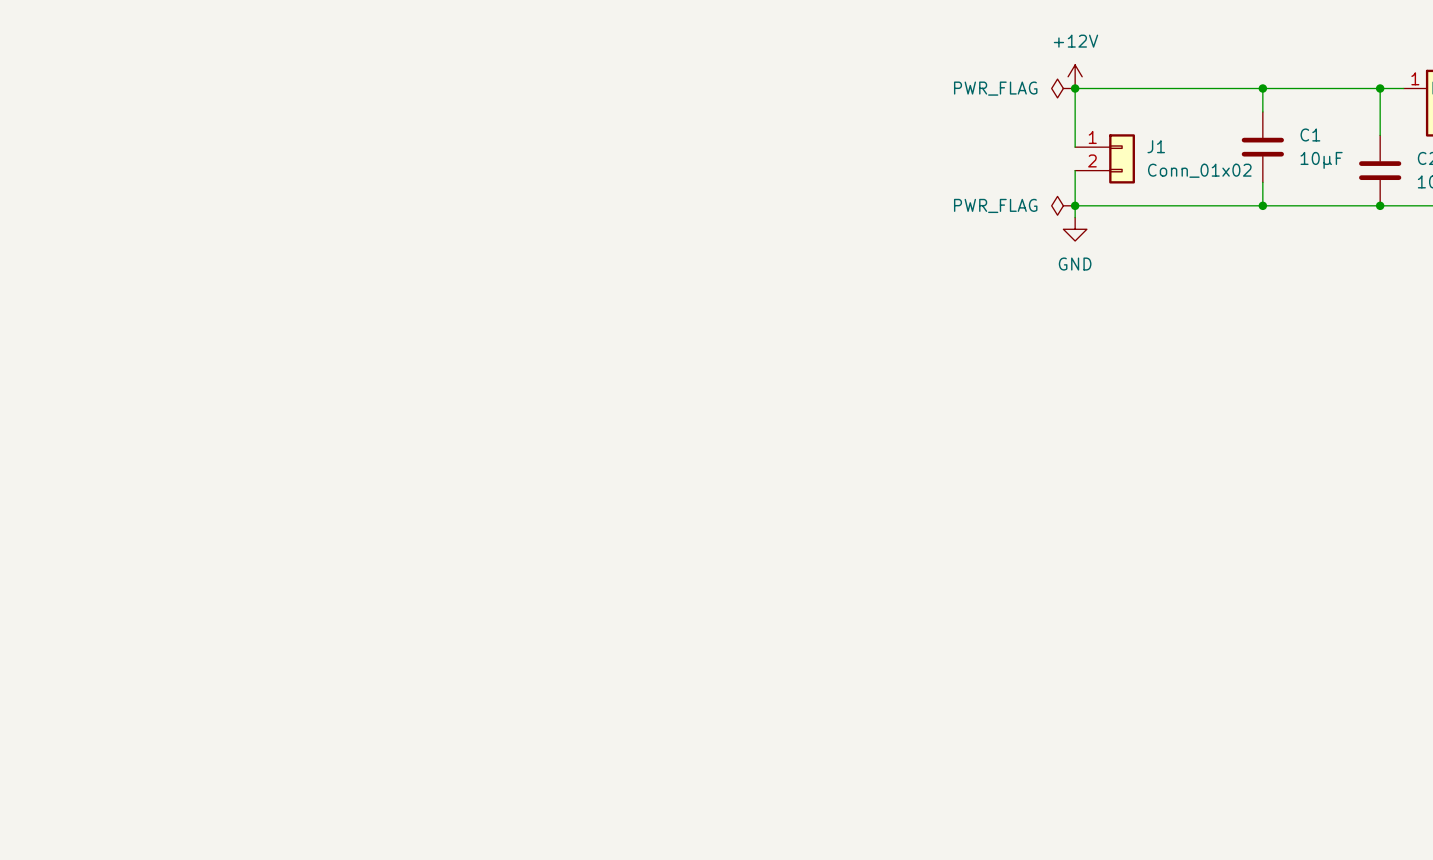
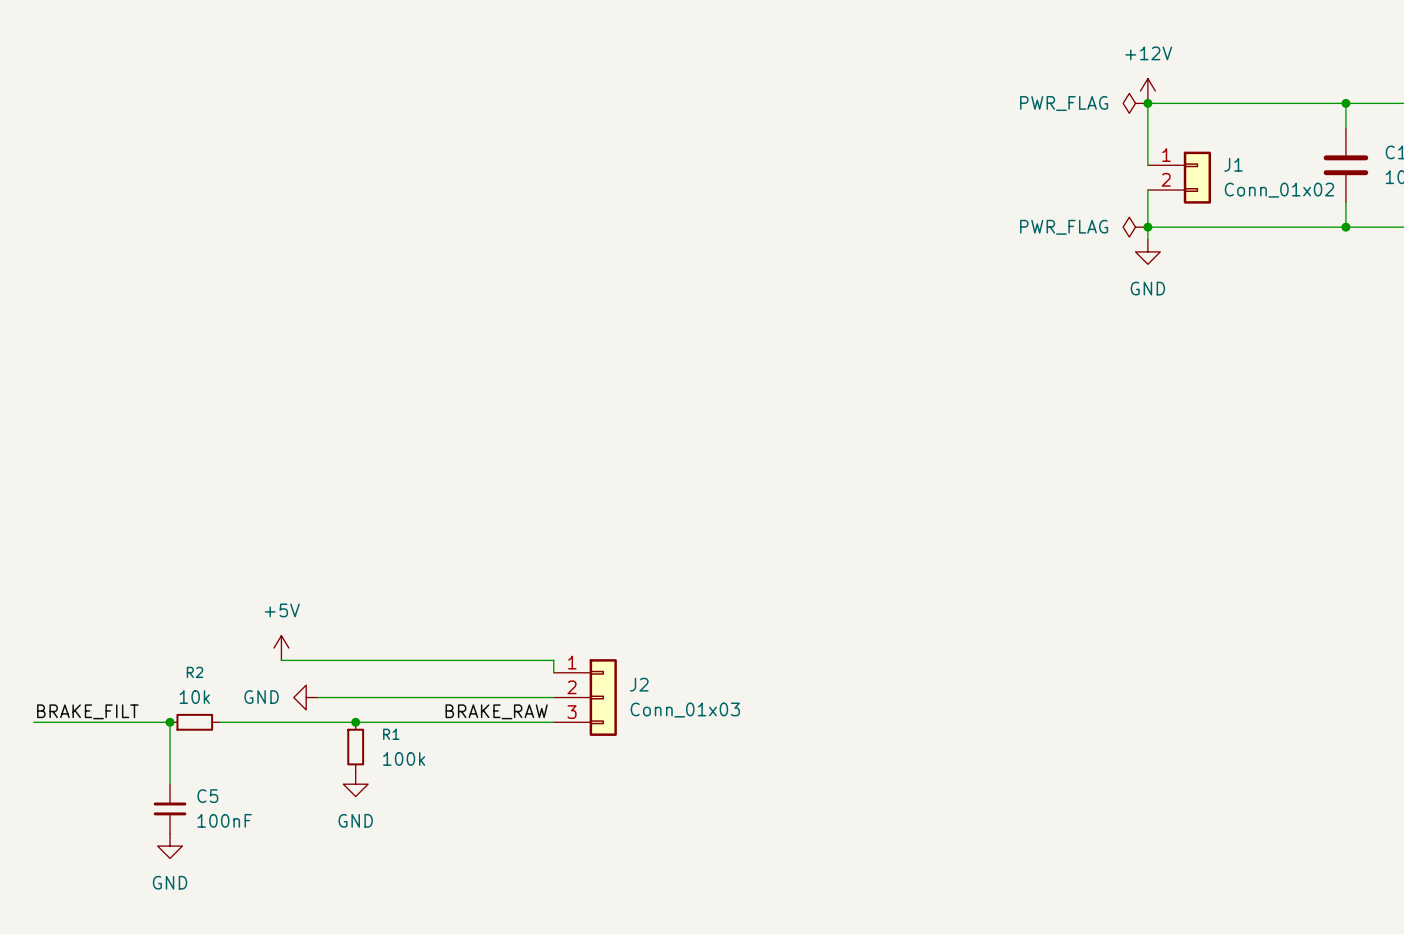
power symbol: none -> +5V (281, 648)
wire: none -> (281, 660) (553, 660) (553, 672)
power symbol: none -> GND (306, 697)
wire: none -> (318, 697) (553, 697)
J2: none -> Conn_01x03 (585, 697)
label: none -> BRAKE_FILT (87, 711)
label: none -> BRAKE_RAW (496, 711)
wire: none -> (33, 722) (170, 722) (170, 784)
junction: none -> (170, 722)
R2: none -> 10k (194, 722)
wire: none -> (219, 722) (553, 722)
junction: none -> (355, 722)
R1: none -> 100k (355, 747)
power symbol: none -> GND (355, 784)
C5: none -> 100nF (170, 808)
power symbol: none -> GND (170, 846)

